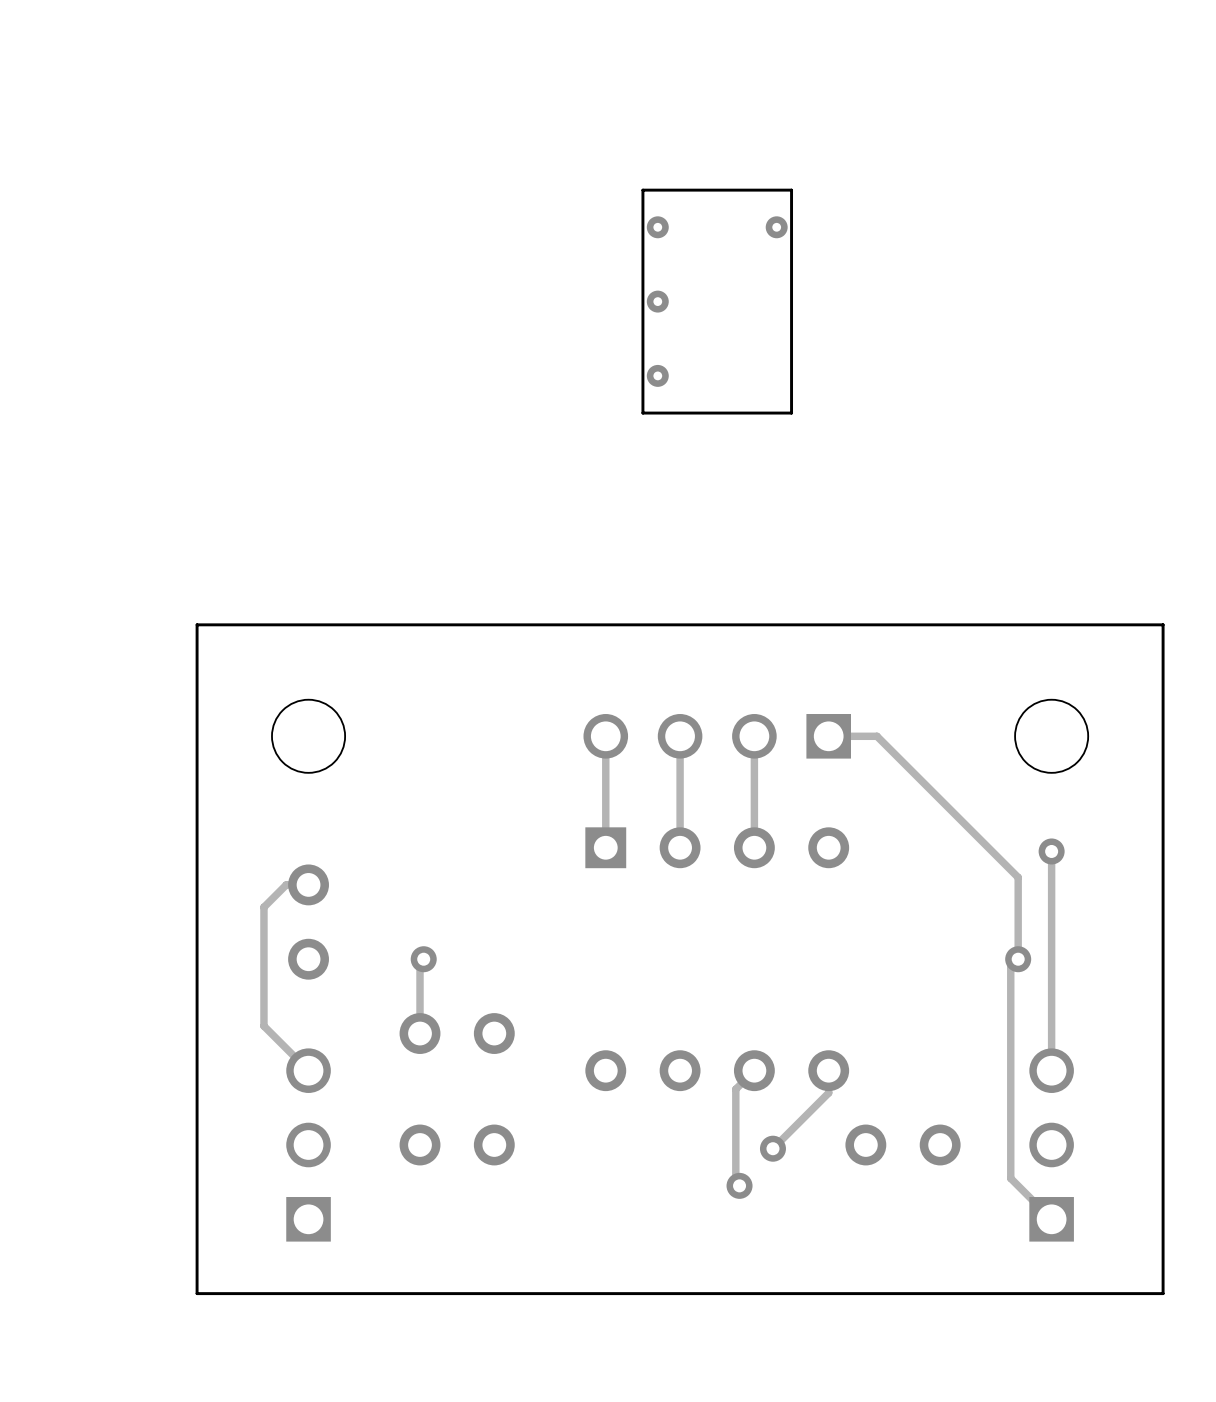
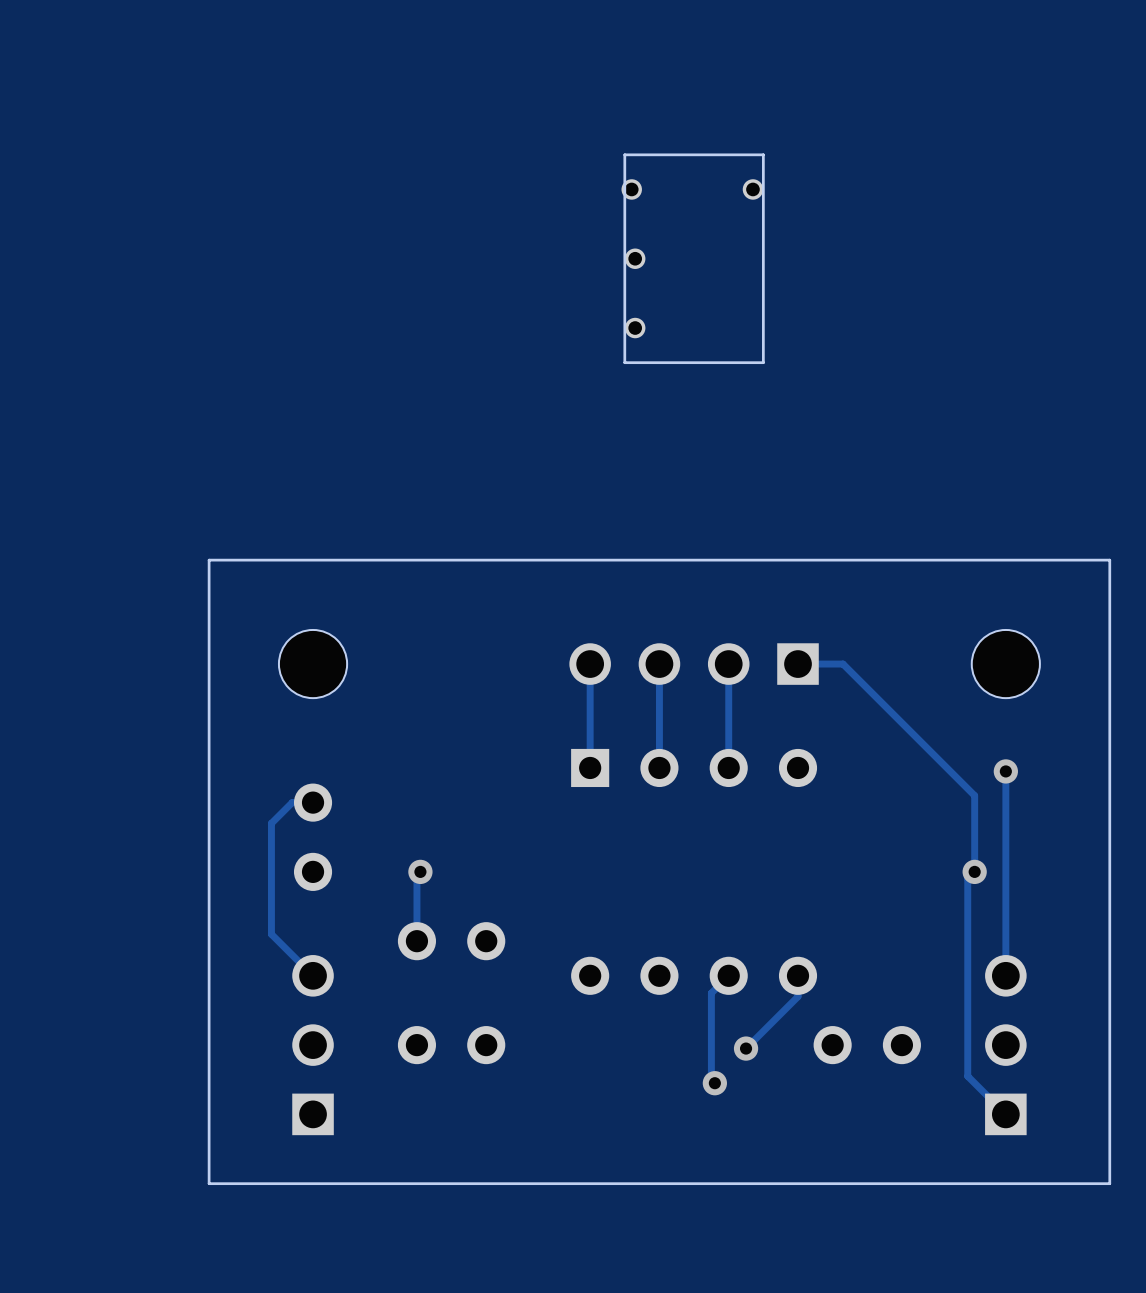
part footprint: [646, 216, 669, 239] -> [621, 179, 642, 200]
part footprint: [765, 216, 788, 239] -> [742, 179, 764, 200]
part footprint: [646, 290, 669, 313] -> [624, 248, 646, 269]
part footprint: [646, 364, 669, 387] -> [624, 317, 646, 339]

